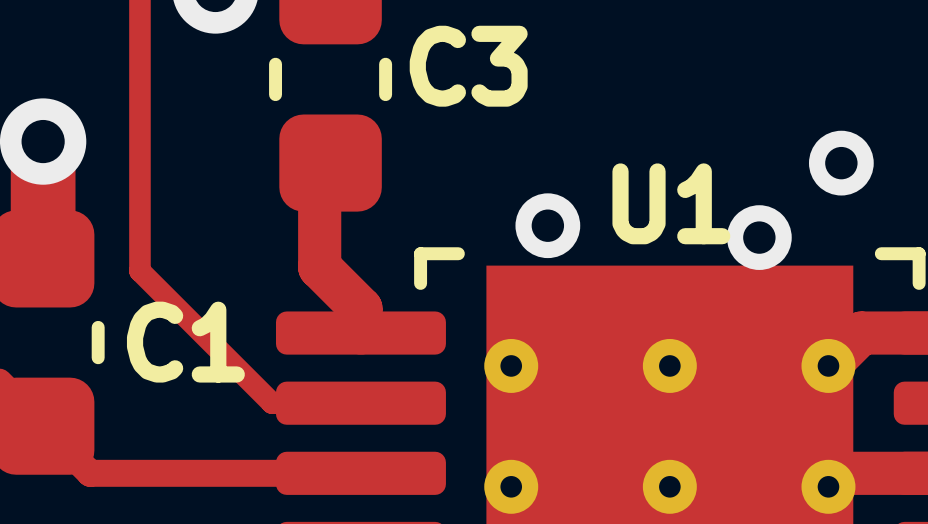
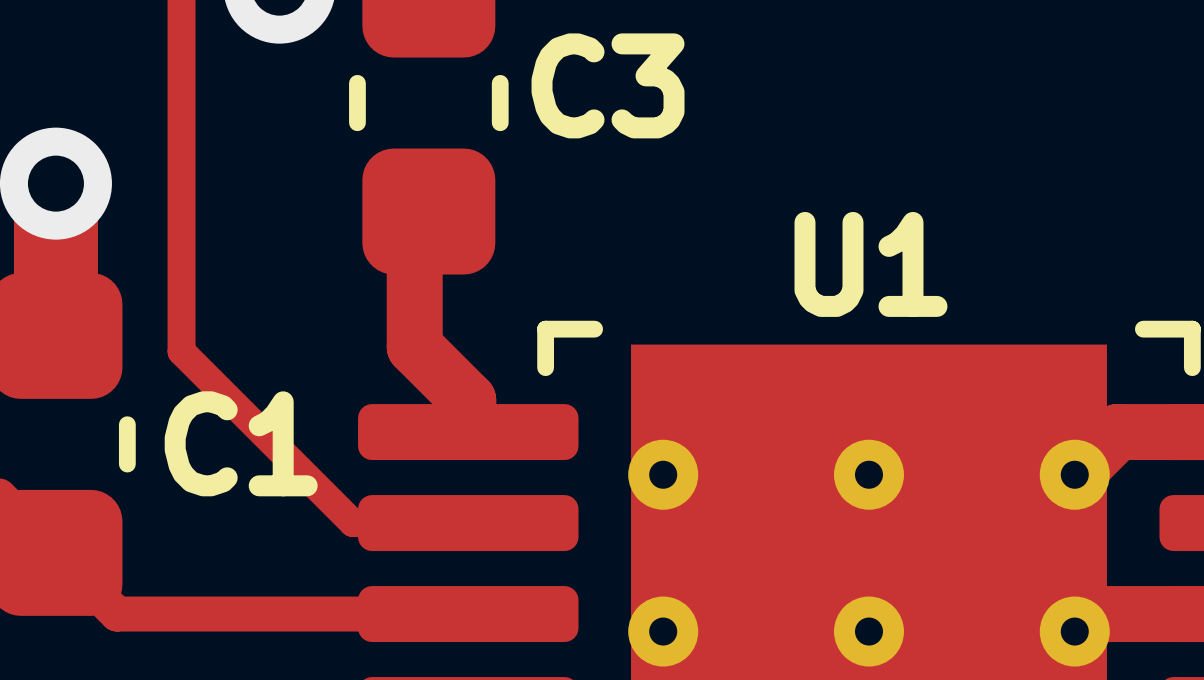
via: (841, 163) -> none
via: (547, 225) -> none
via: (759, 237) -> none

